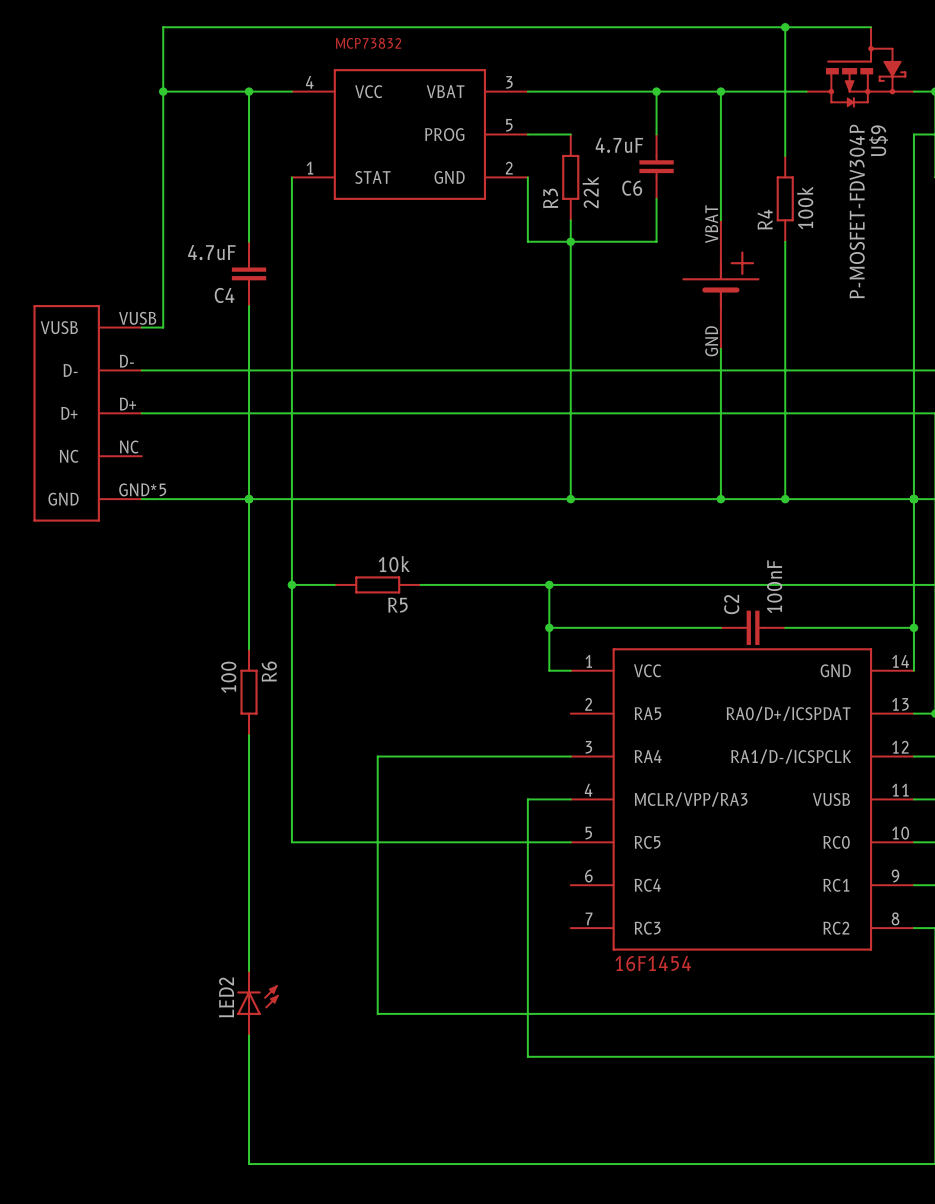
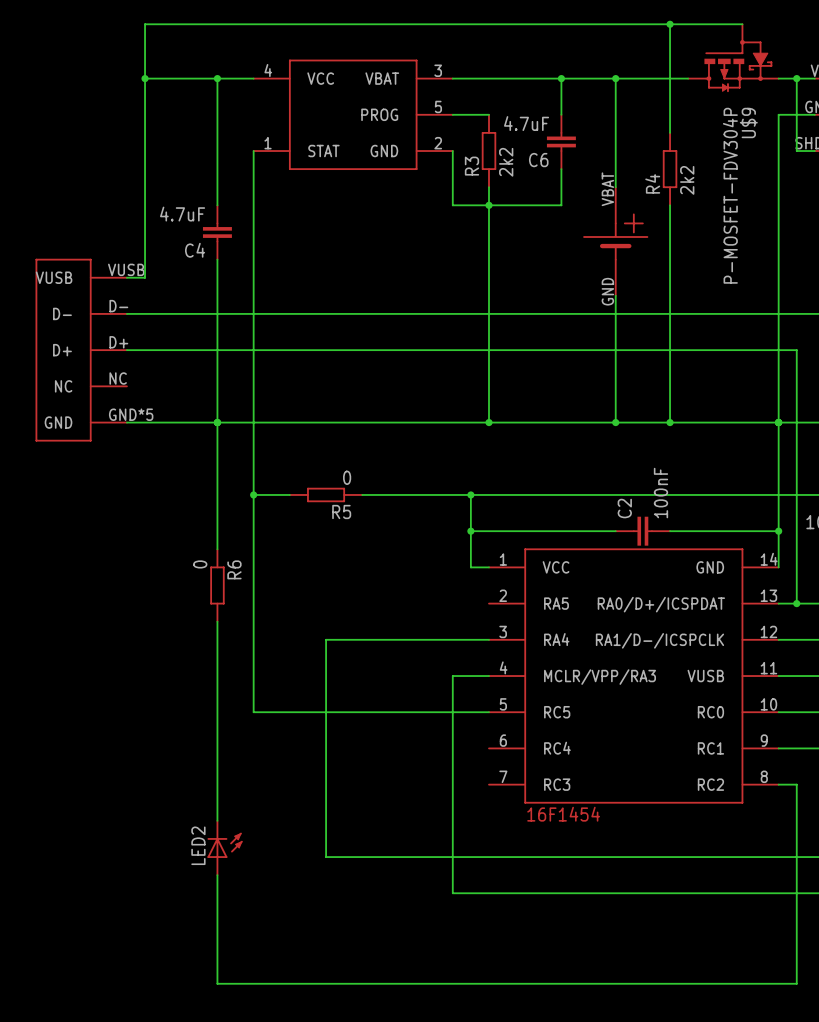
MCP73832 name: MCP73832 (368, 43) -> none
R3 value: 22k (590, 192) -> 2k2 (506, 162)
R4 value: 100k (805, 207) -> 2k2 (687, 180)
R5 value: 10k (394, 564) -> 0 (347, 477)
R6 value: 100 (228, 677) -> 0 (200, 564)

